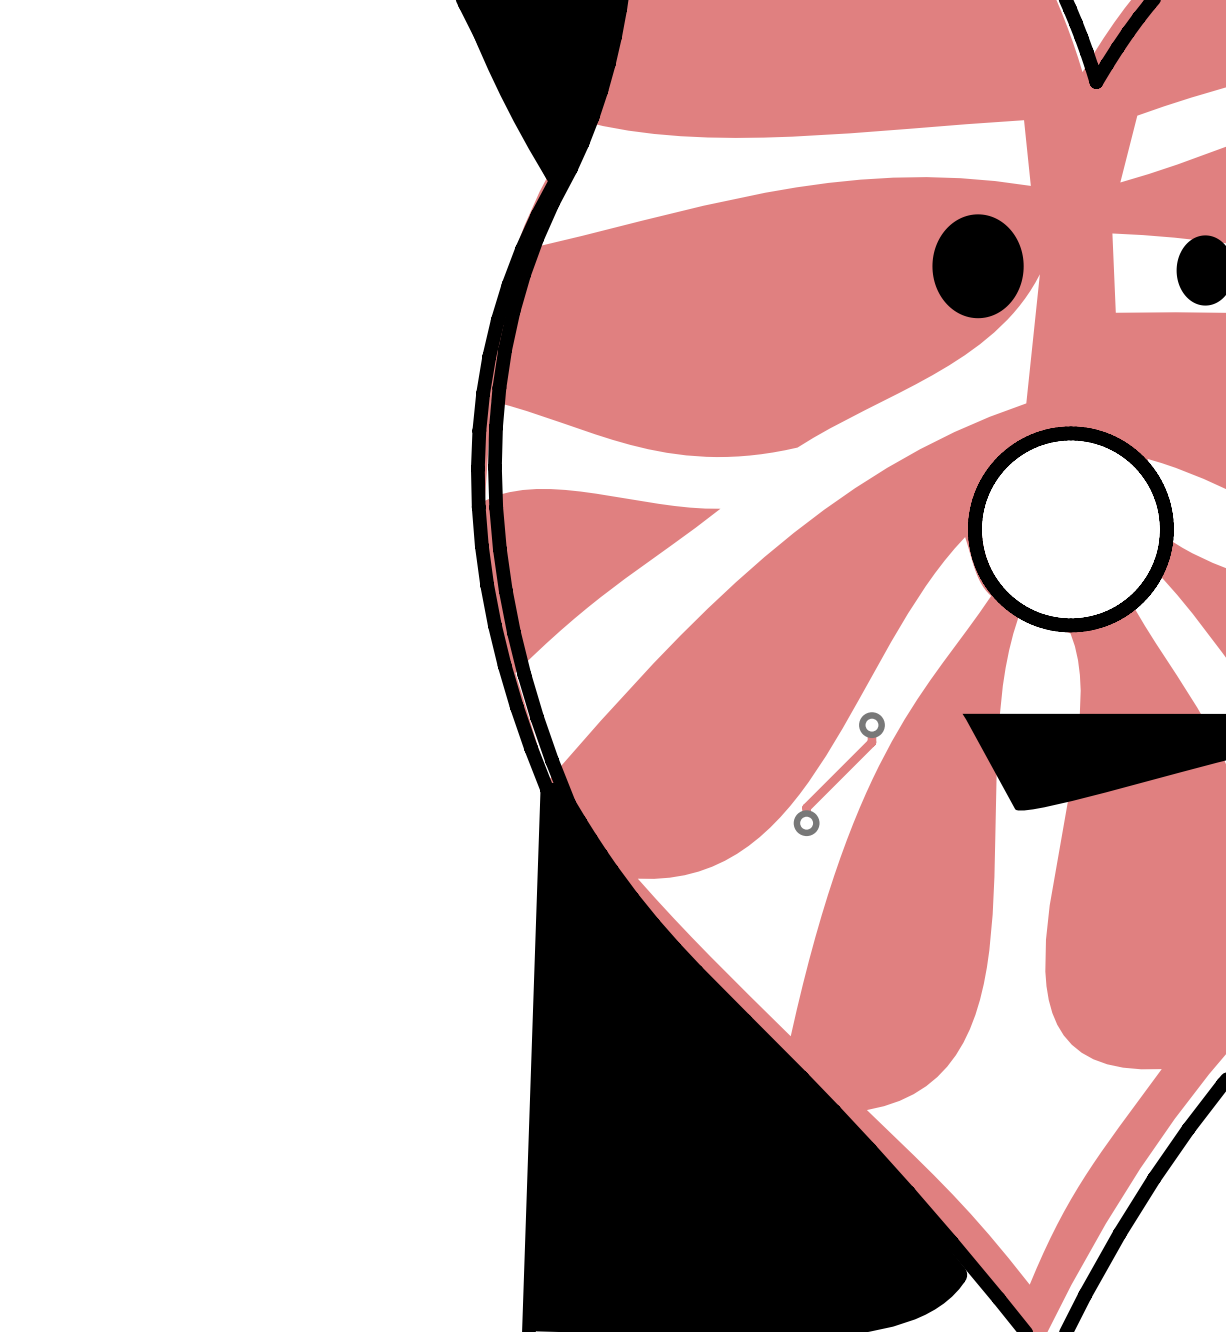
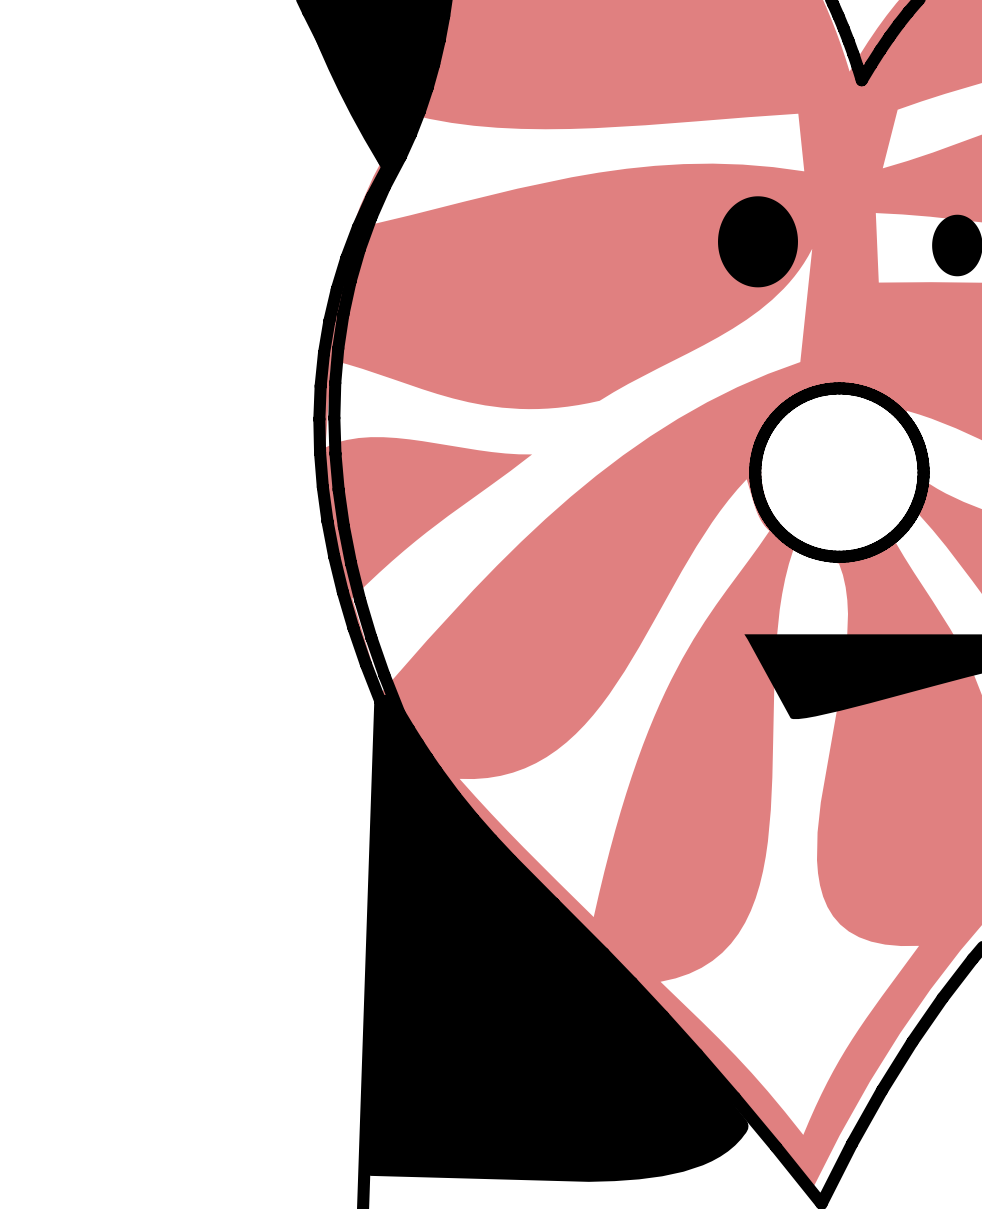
track: (871, 725) (871, 742) (806, 807) (806, 823) -> none
via: (871, 725) -> none
via: (806, 823) -> none

